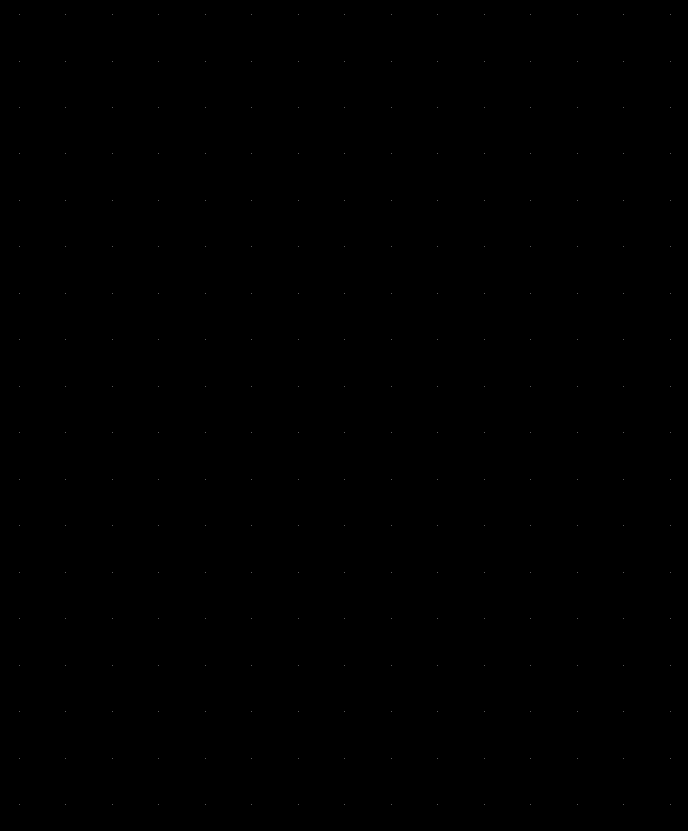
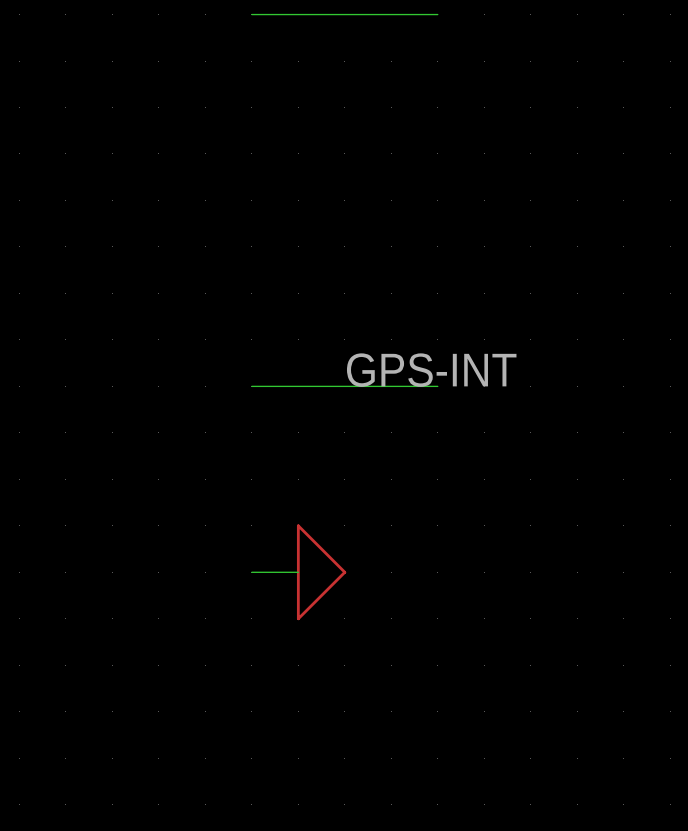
wire: none -> (251, 14) (437, 14)
label: none -> GPS-INT (431, 370)
wire: none -> (251, 386) (437, 386)
wire: none -> (251, 572) (298, 572)
power symbol: none -> (321, 572)

